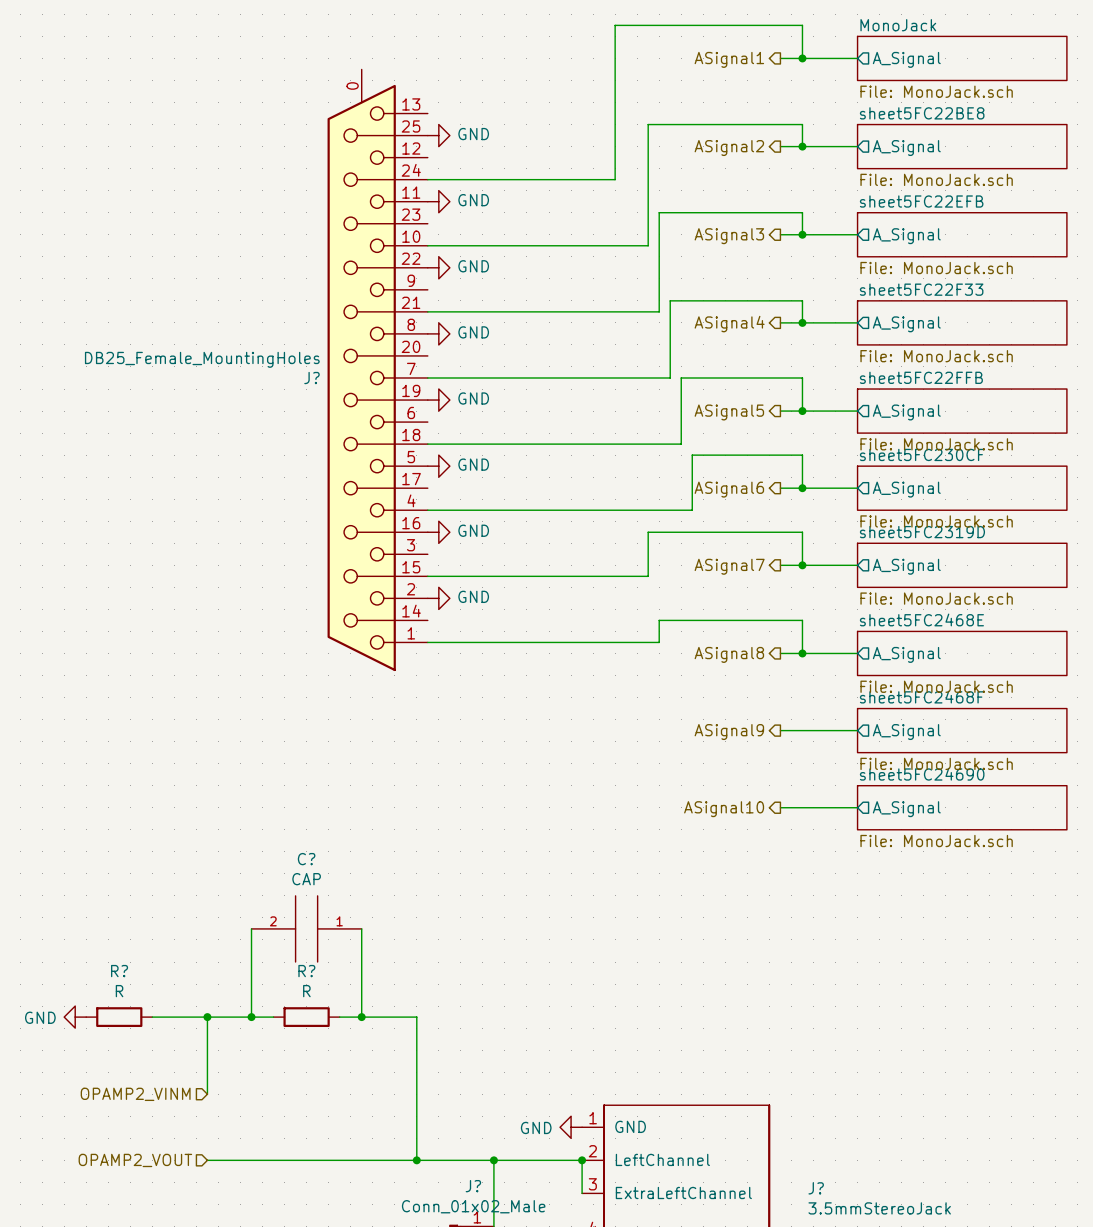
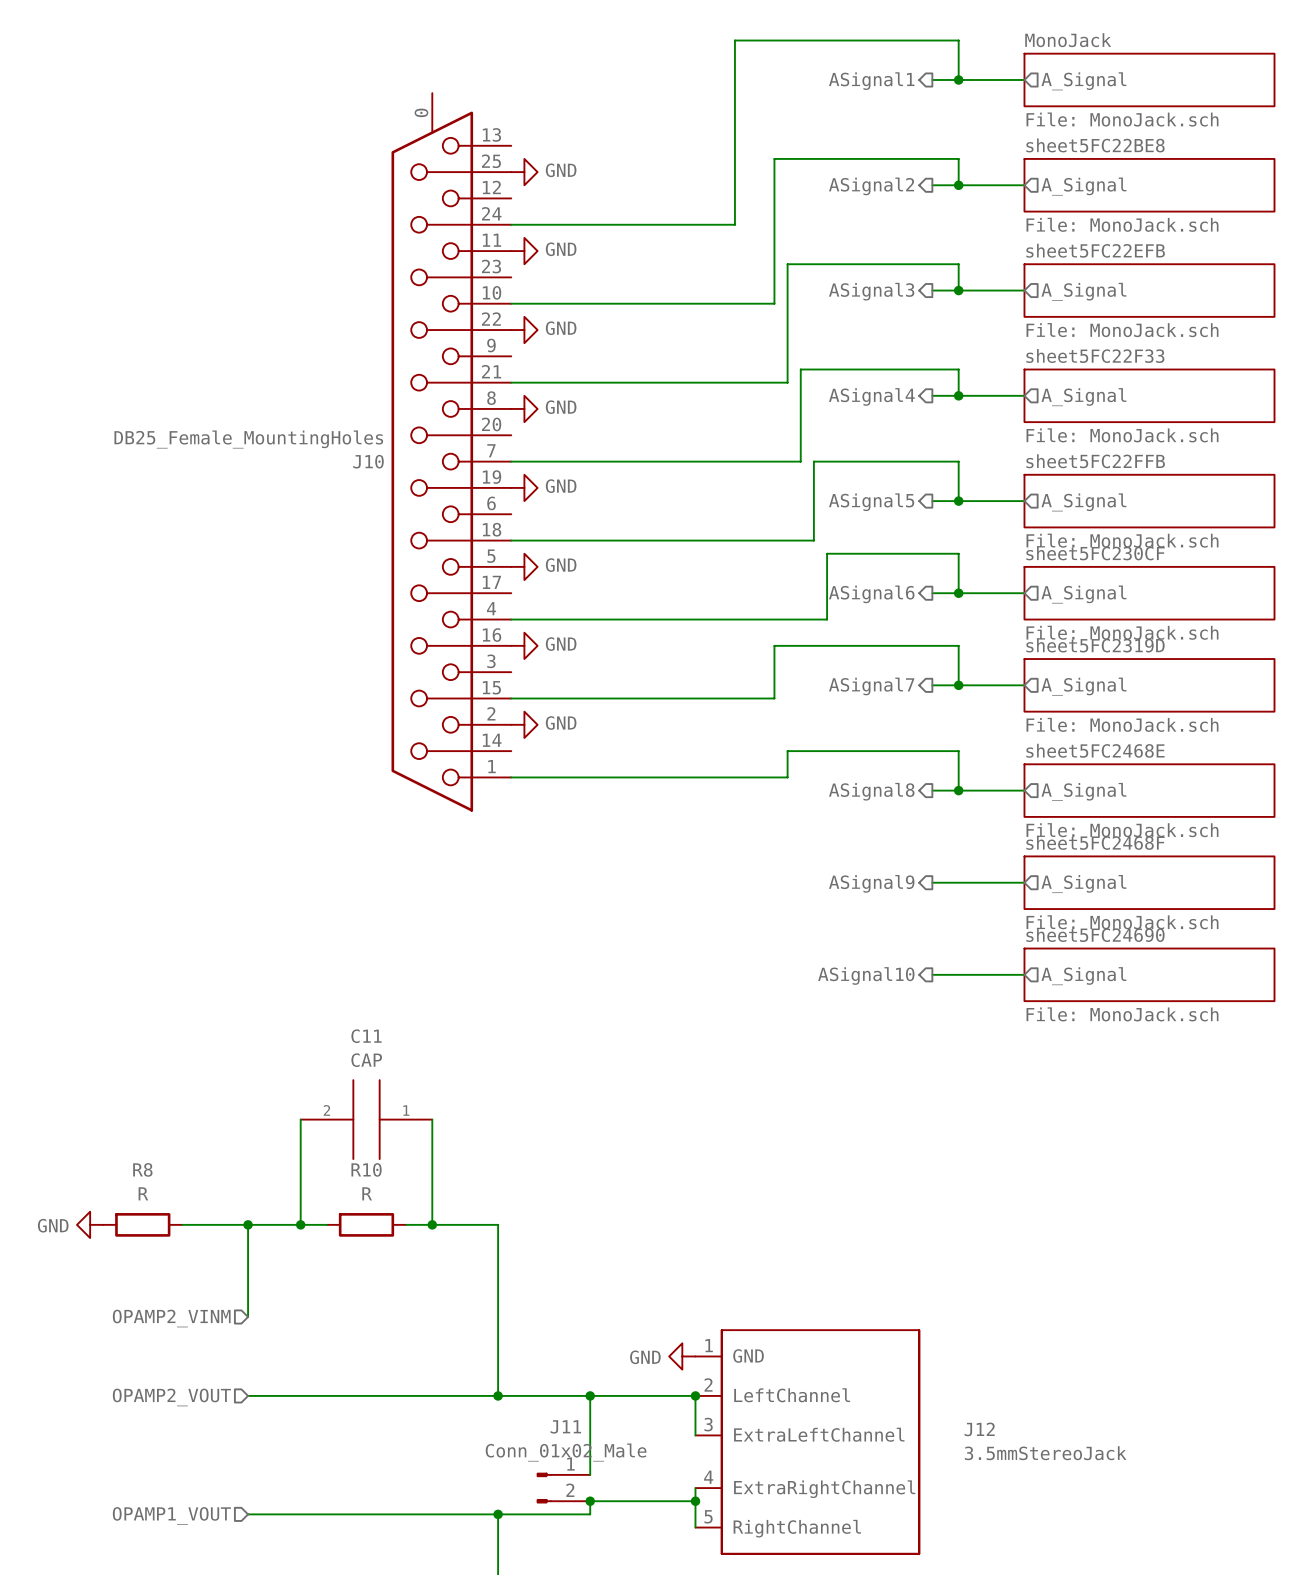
J? name: J? (311, 378) -> J10 (368, 461)
C? name: C? (306, 859) -> C11 (366, 1036)
R? name: R? (119, 971) -> R8 (142, 1169)
R? name: R? (306, 971) -> R10 (366, 1169)
J? name: J? (473, 1186) -> J11 (565, 1426)
J? name: J? (816, 1188) -> J12 (979, 1429)

